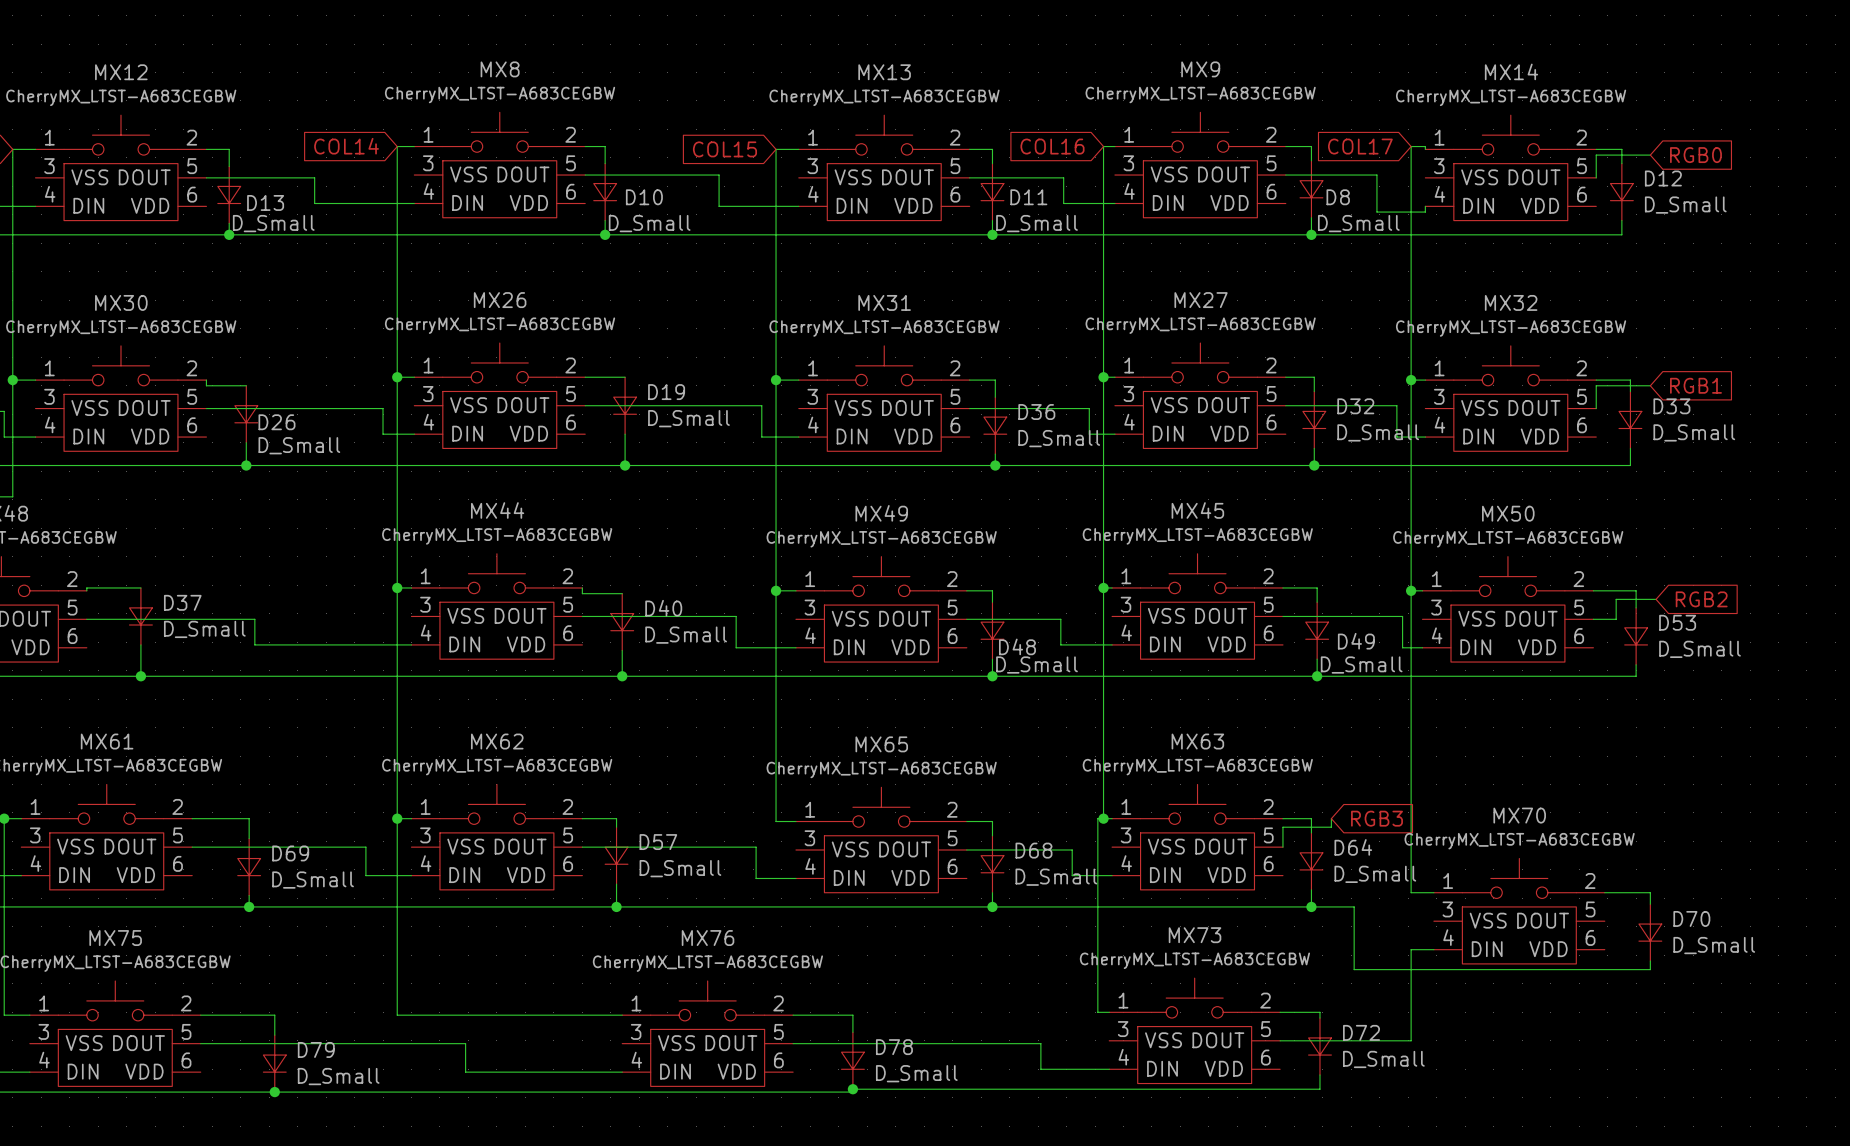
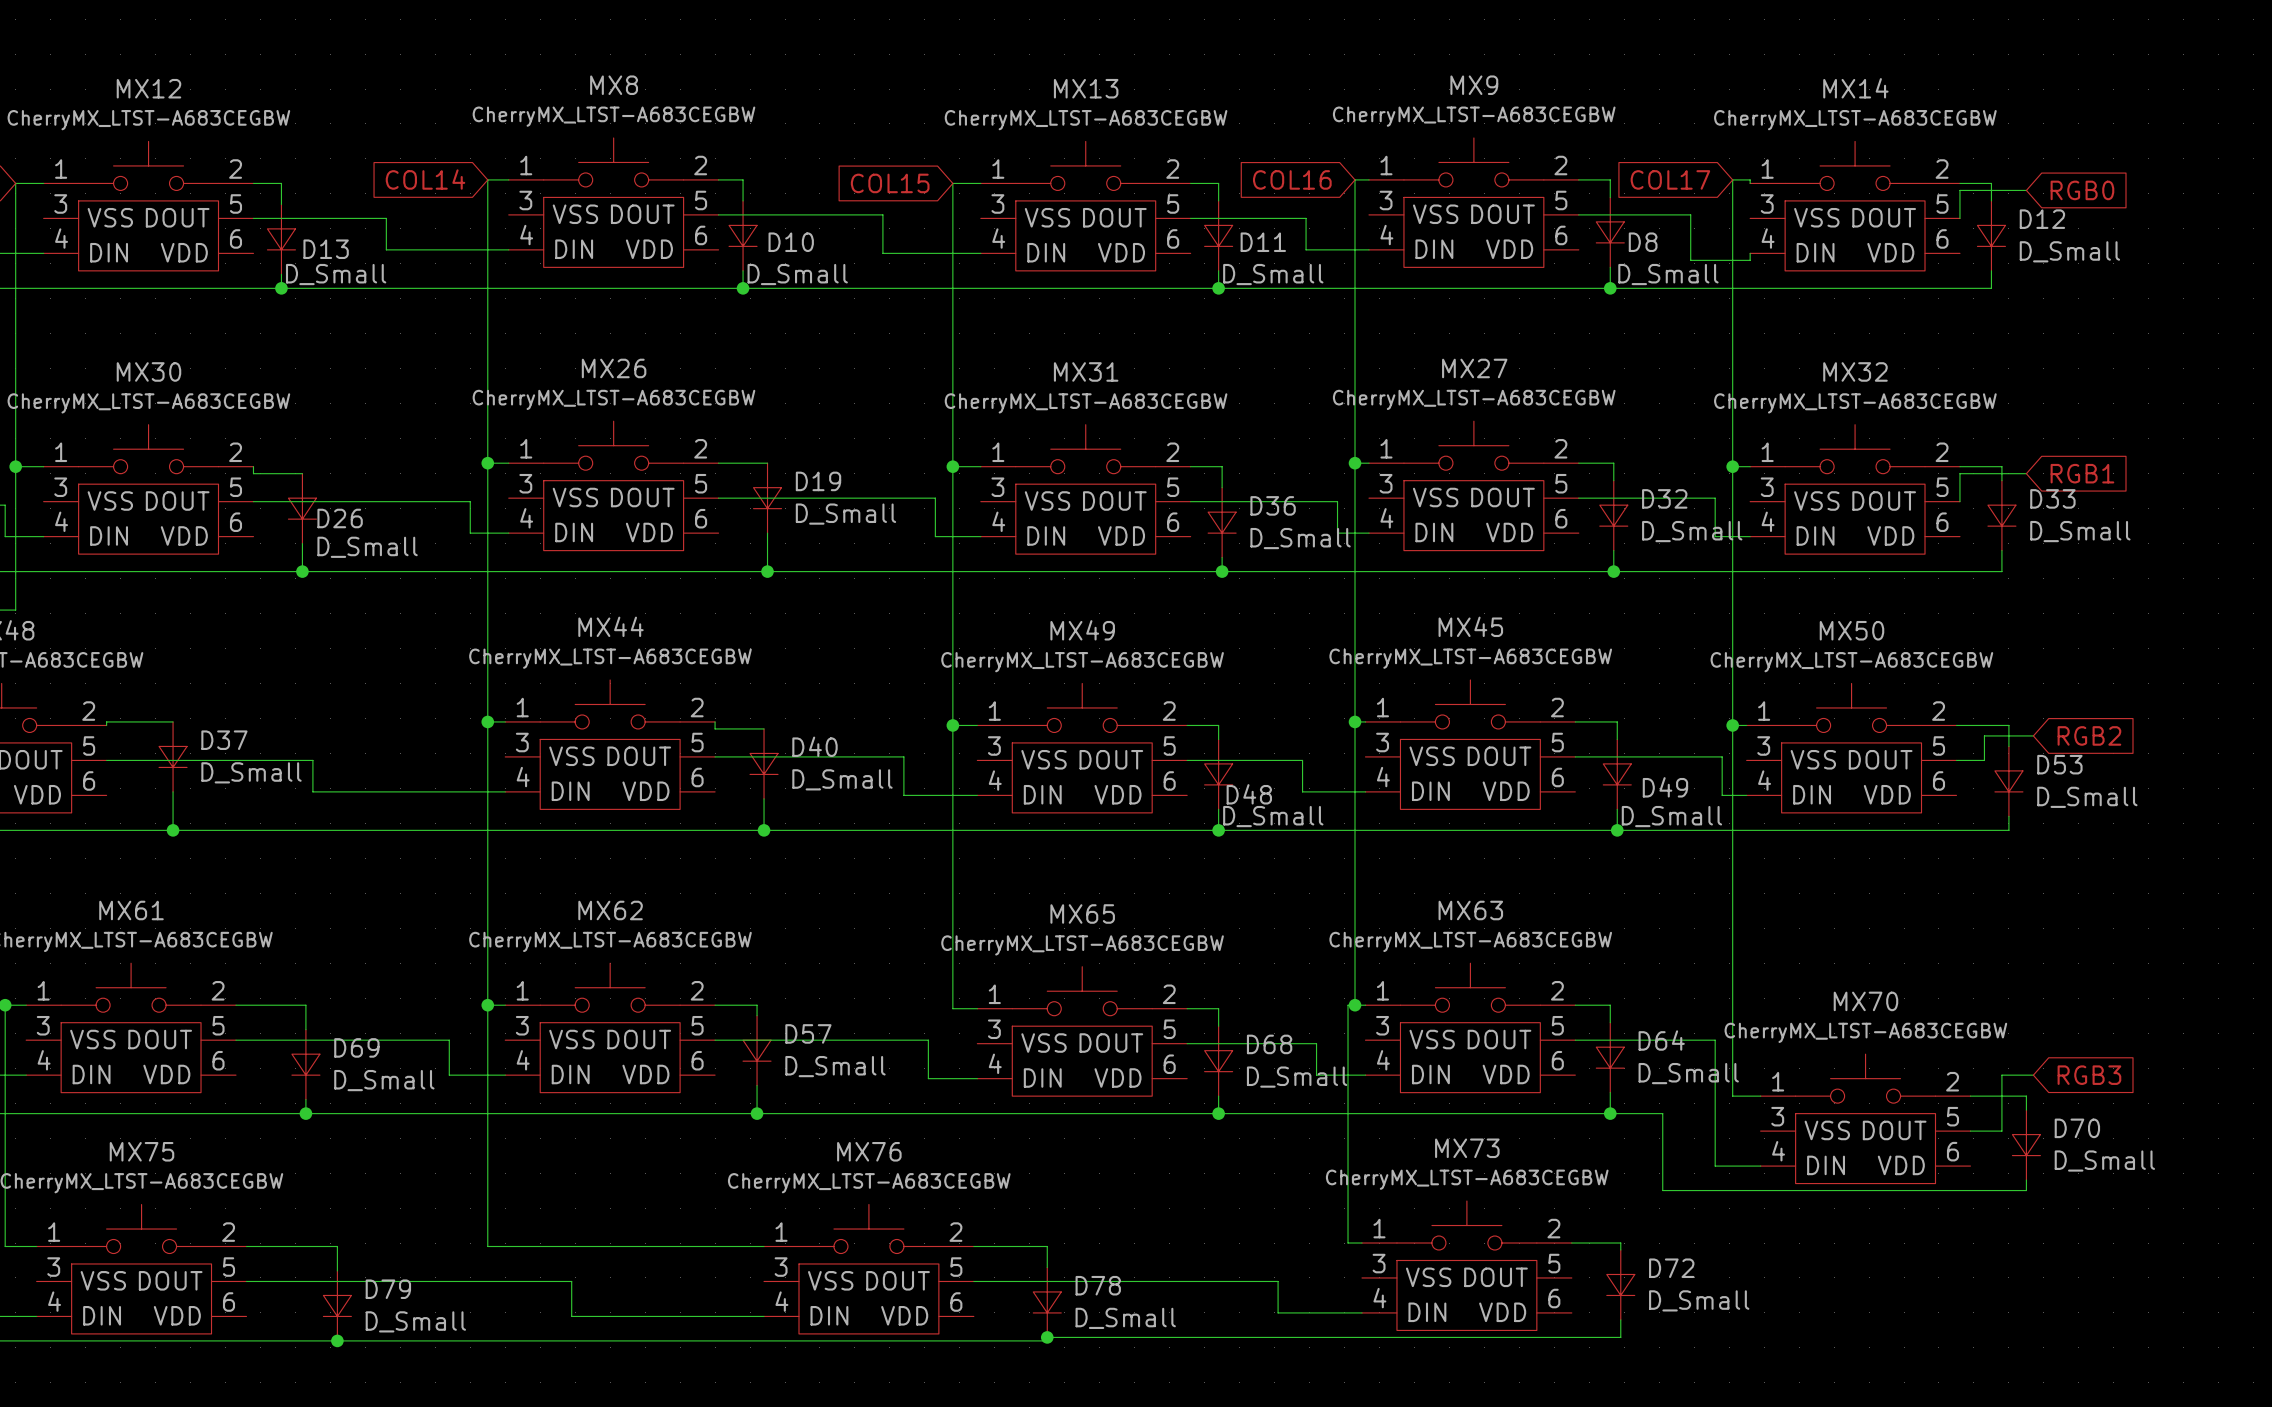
wire: (1331, 818) (1331, 827) (1282, 827) (1282, 847) -> (1732, 1166) (1715, 1166) (1715, 1040) (1575, 1040)
global label: RGB3 (1377, 818) -> none
wire: none -> (2033, 1075) (2001, 1075) (2001, 1131) (1970, 1131)
global label: none -> RGB3 (2089, 1075)
wire: (1411, 949) (1411, 1040) (1280, 1040) -> none

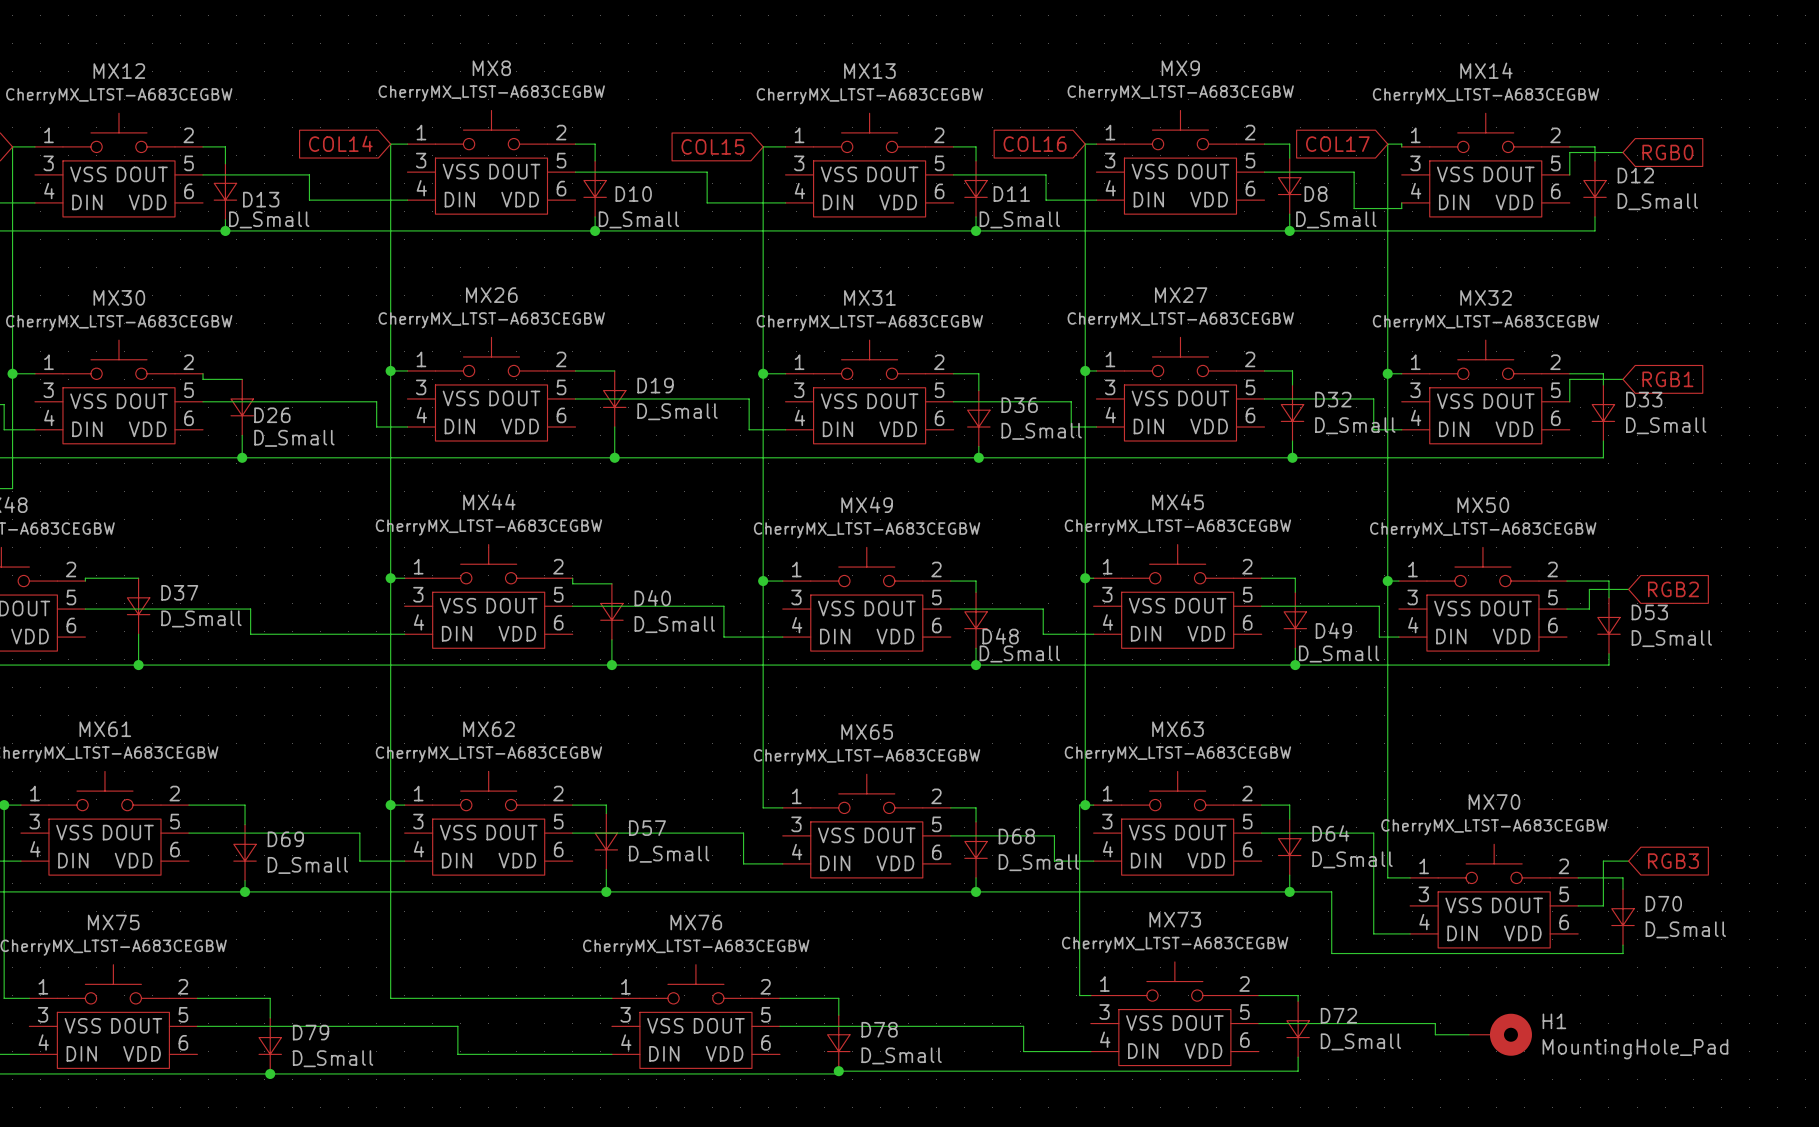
wire: none -> (1258, 1023) (1435, 1023) (1435, 1034) (1468, 1034)
H1: none -> MountingHole_Pad (1500, 1034)

